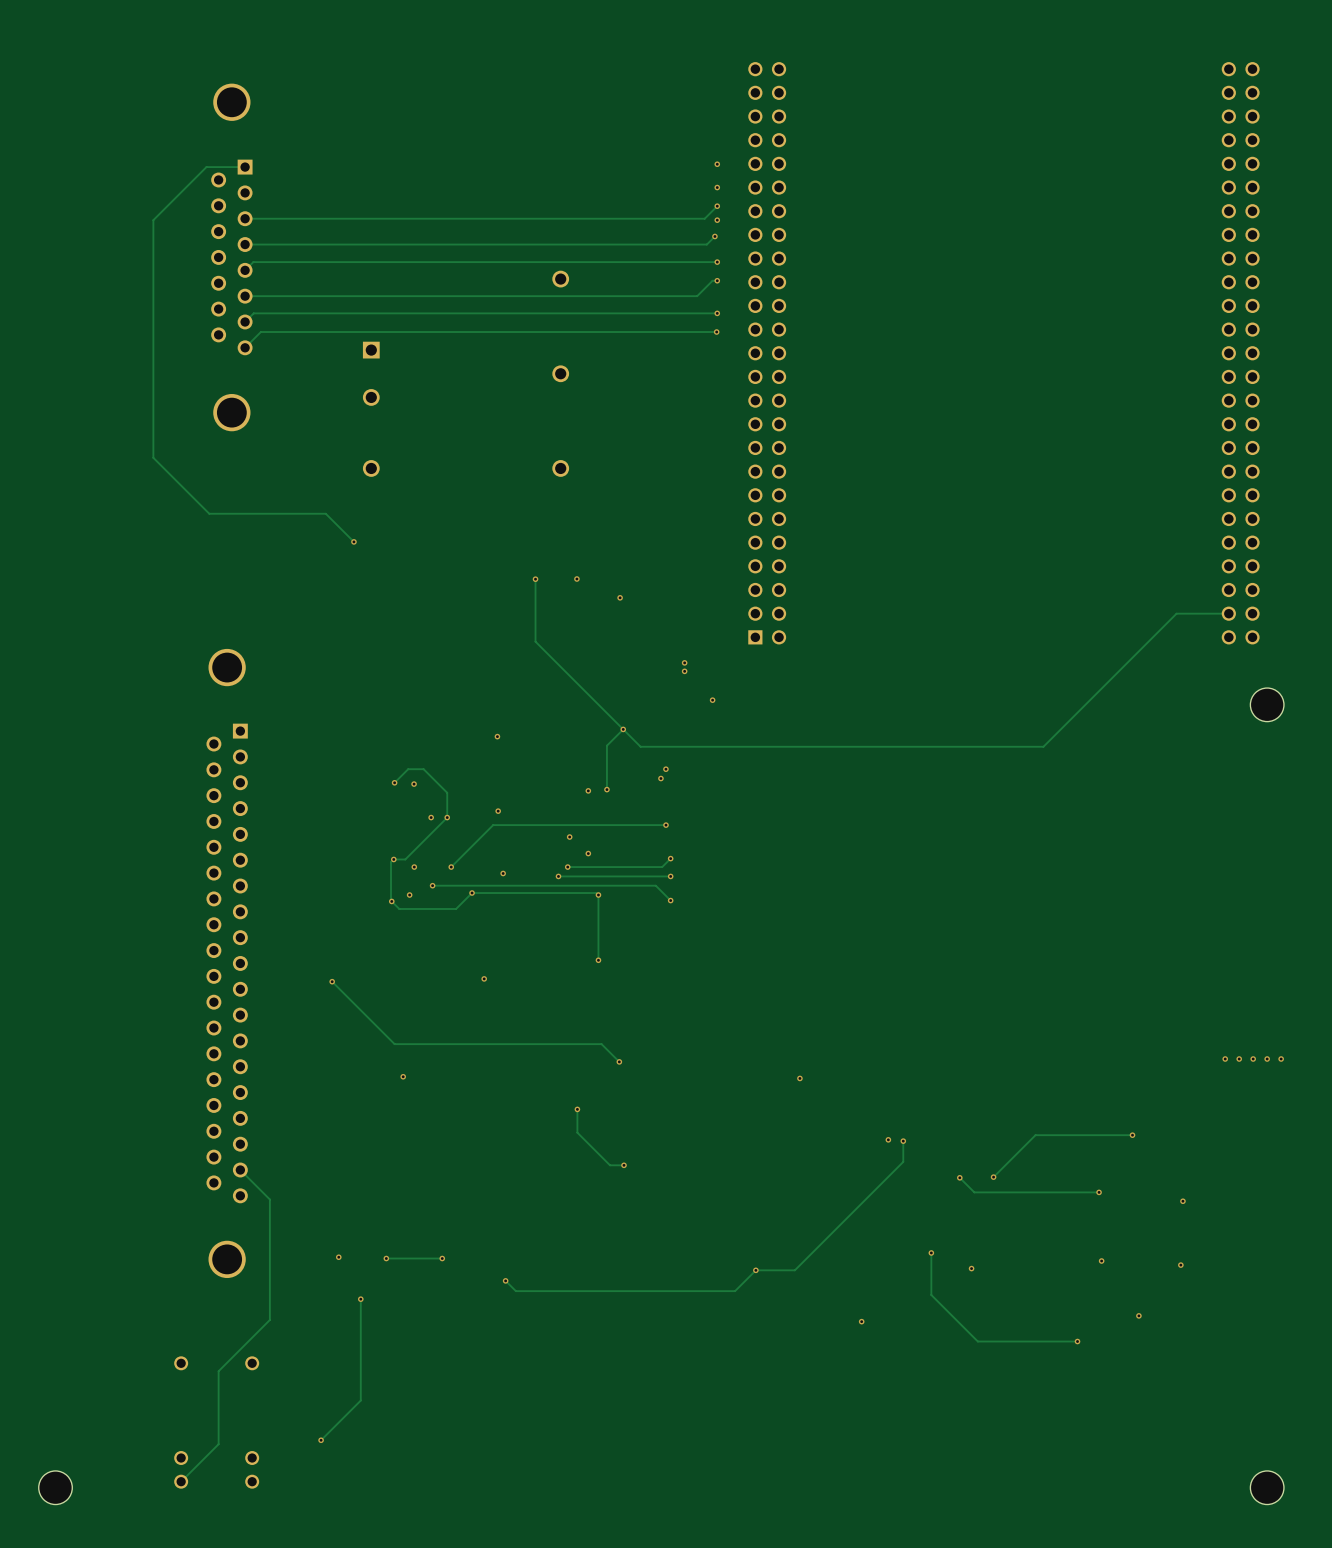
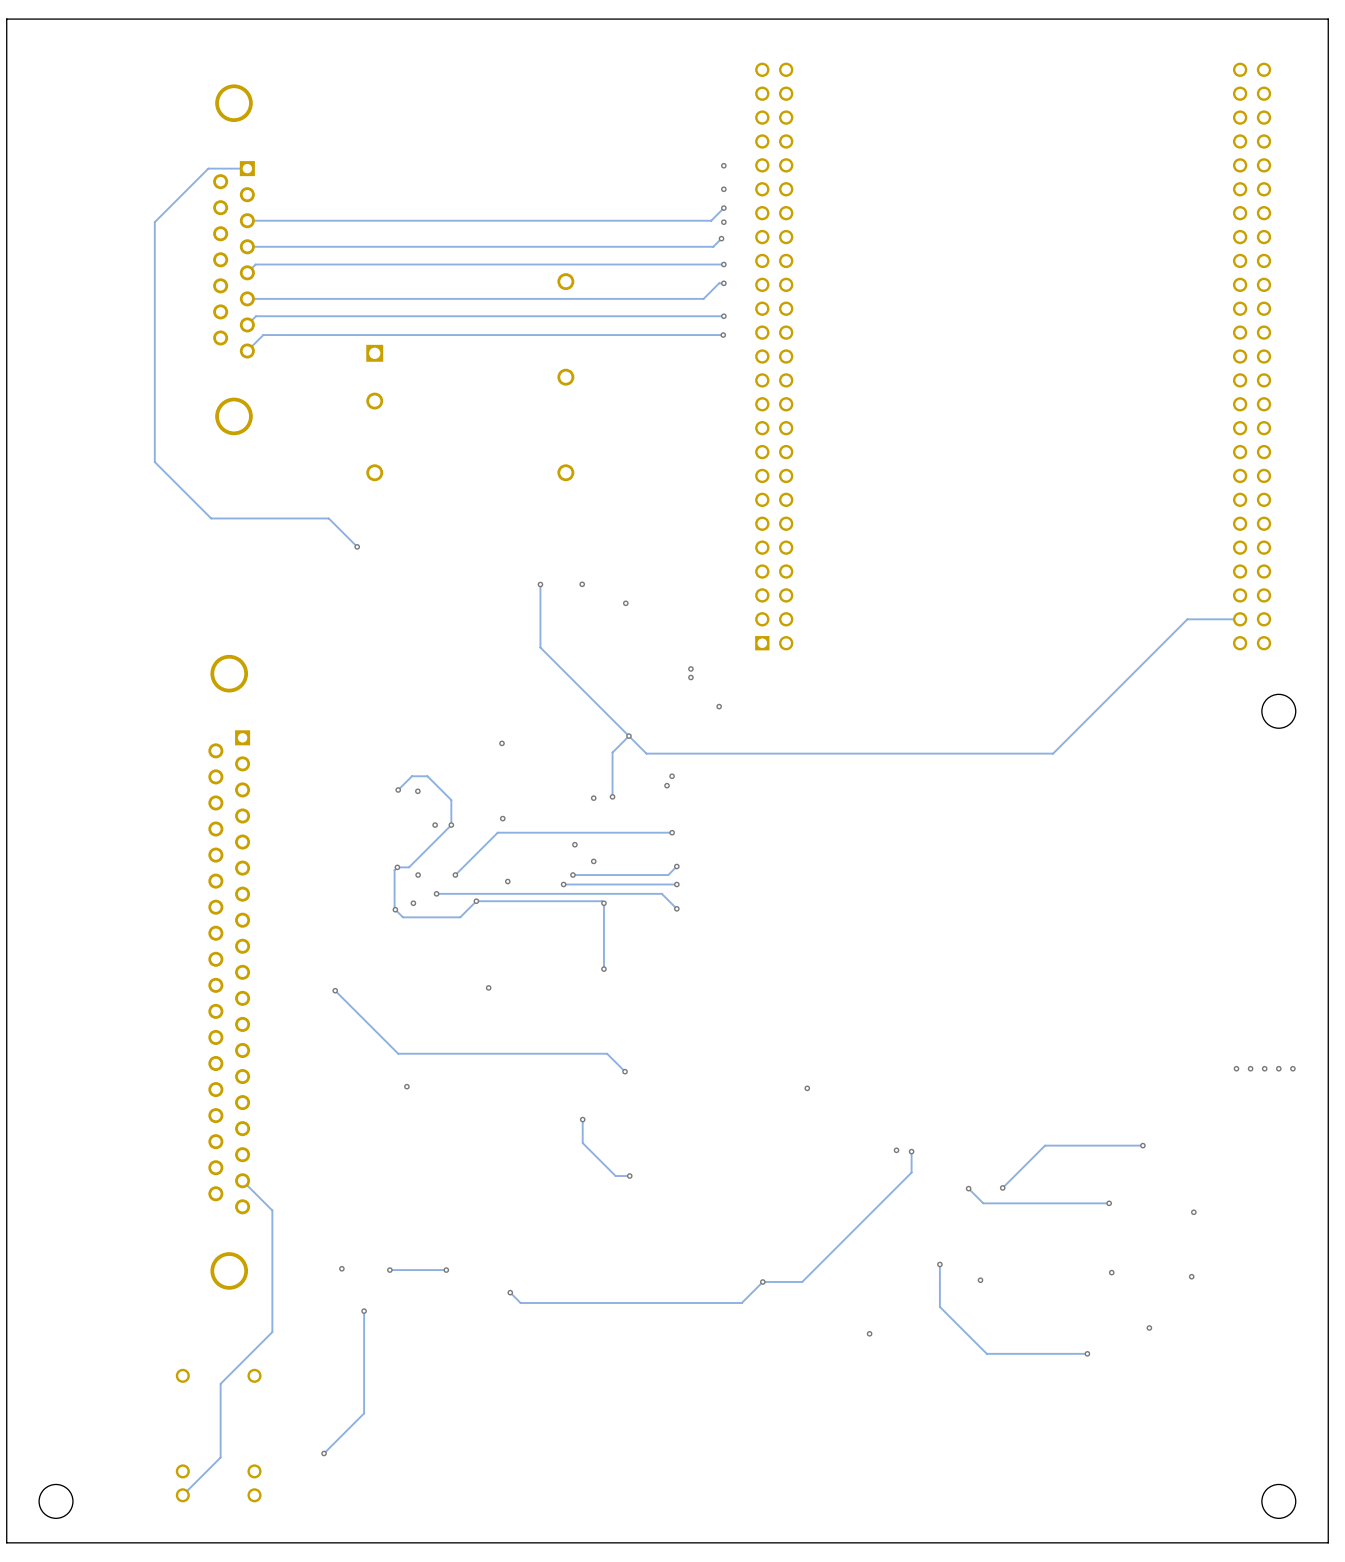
board edge: none -> (1328, 19) (6, 19) (6, 1542) (1328, 1542) (1328, 19)

